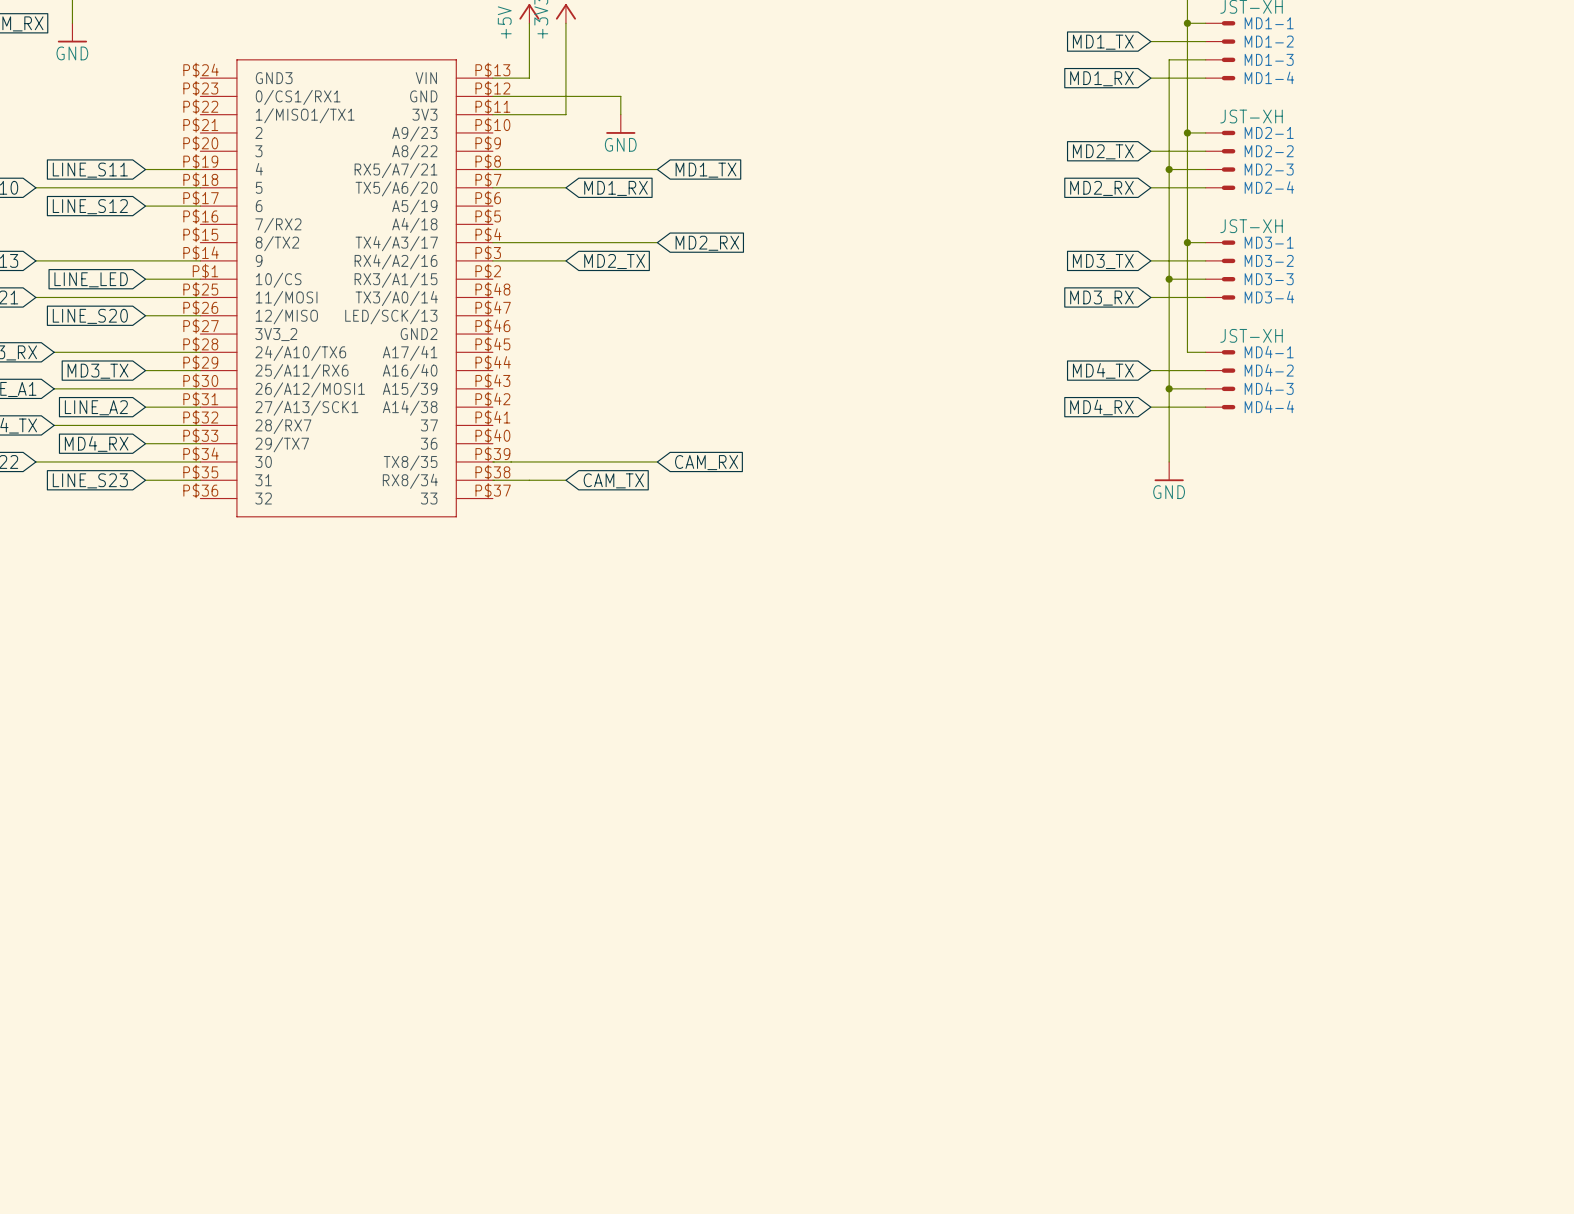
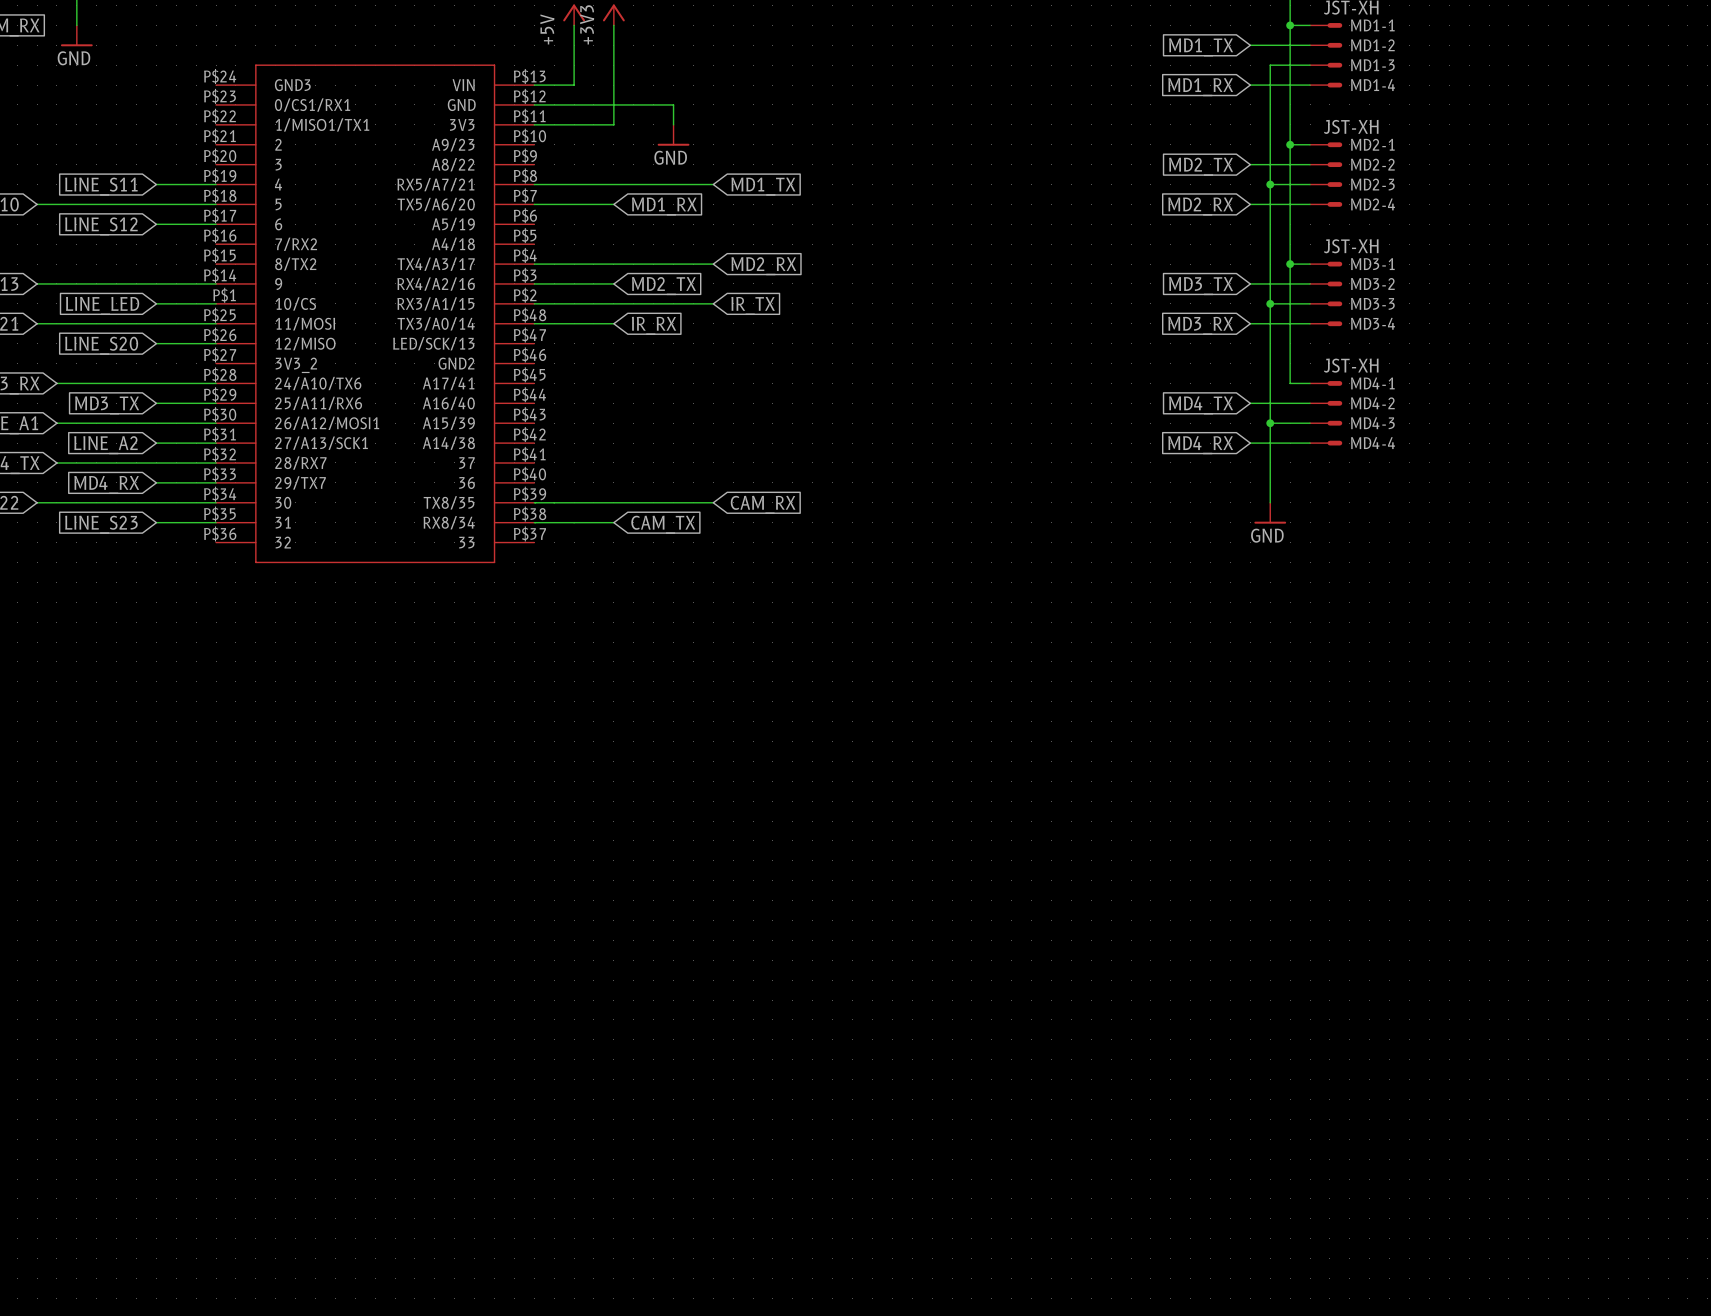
wire: none -> (534, 303) (713, 303)
global label: none -> IR_TX (753, 305)
wire: none -> (534, 323) (613, 323)
global label: none -> IR_RX (654, 325)

